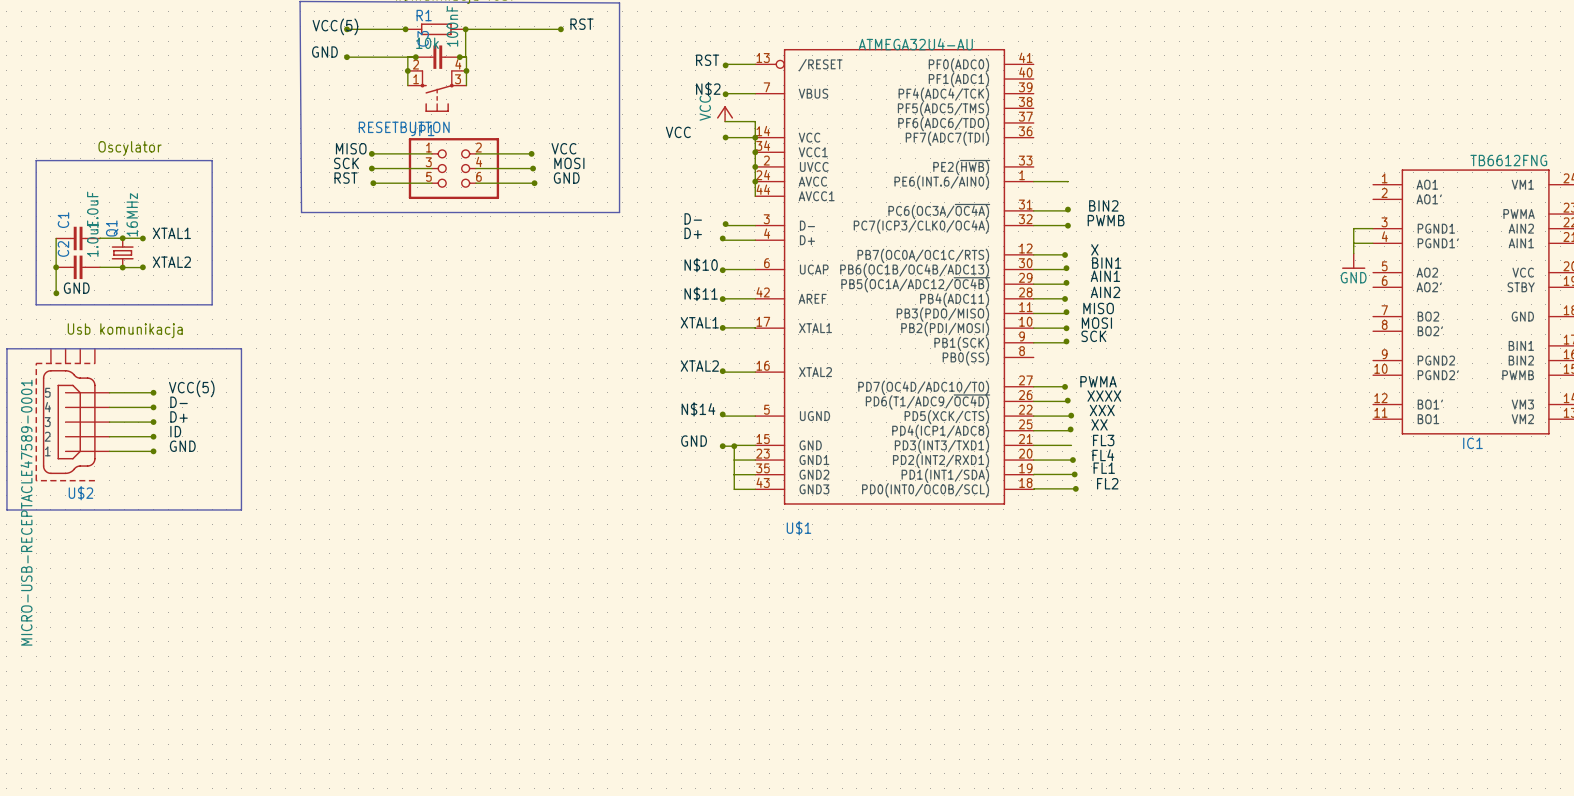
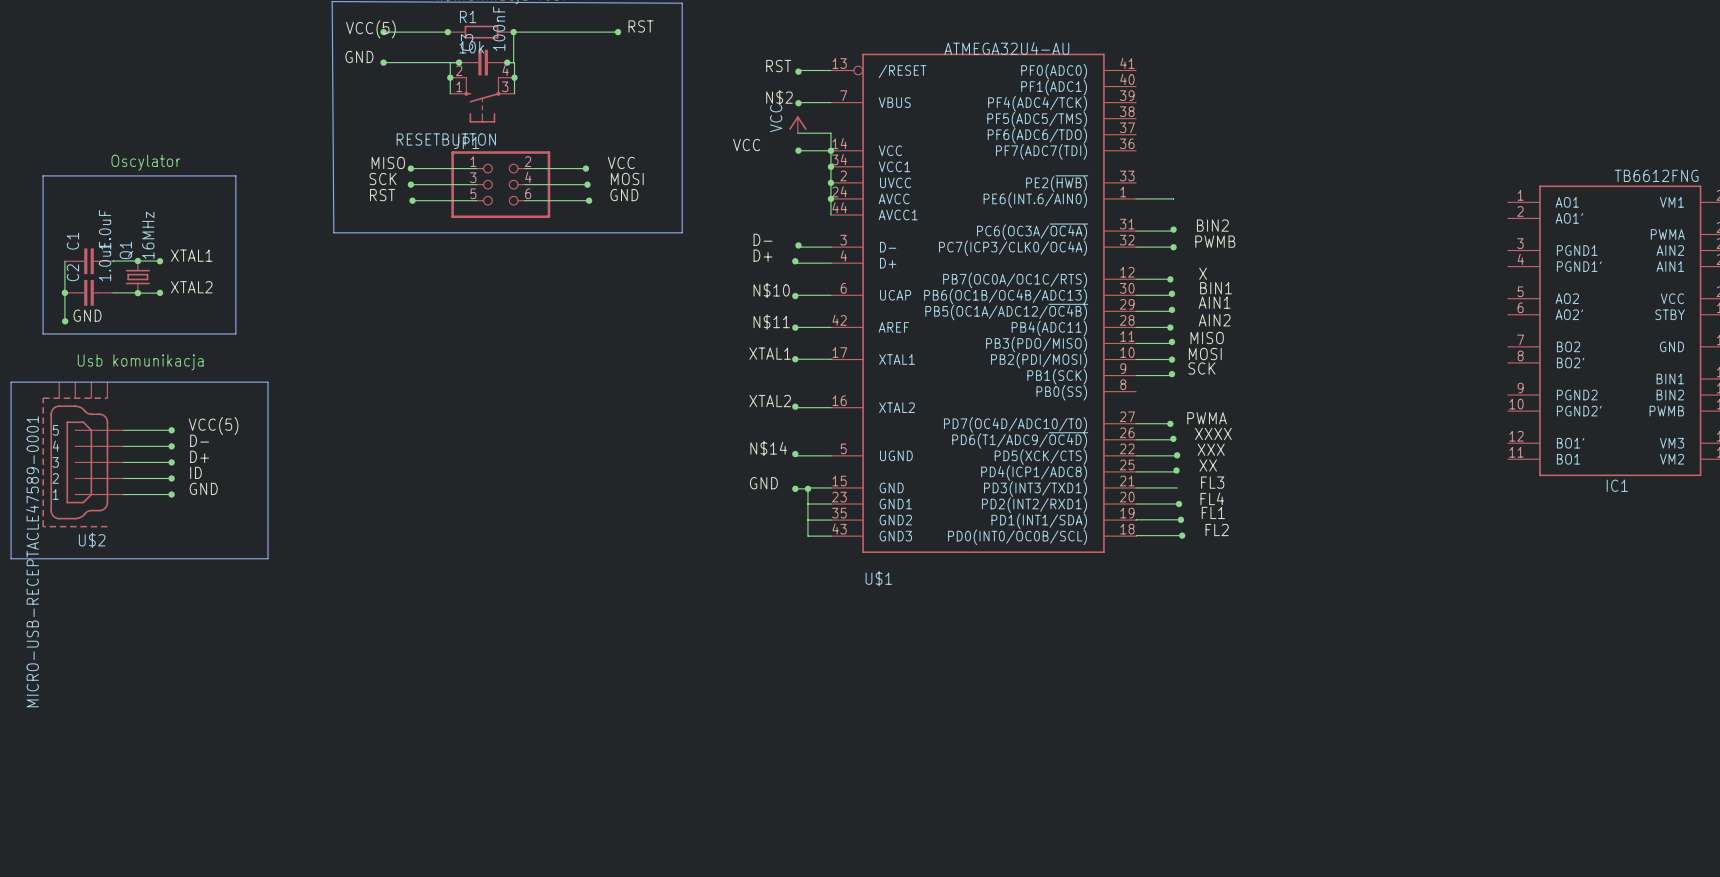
wire: (1372, 228) (1353, 228) (1353, 253) -> none
wire: (1353, 243) (1372, 243) -> none
power symbol: GND (1353, 261) -> none

